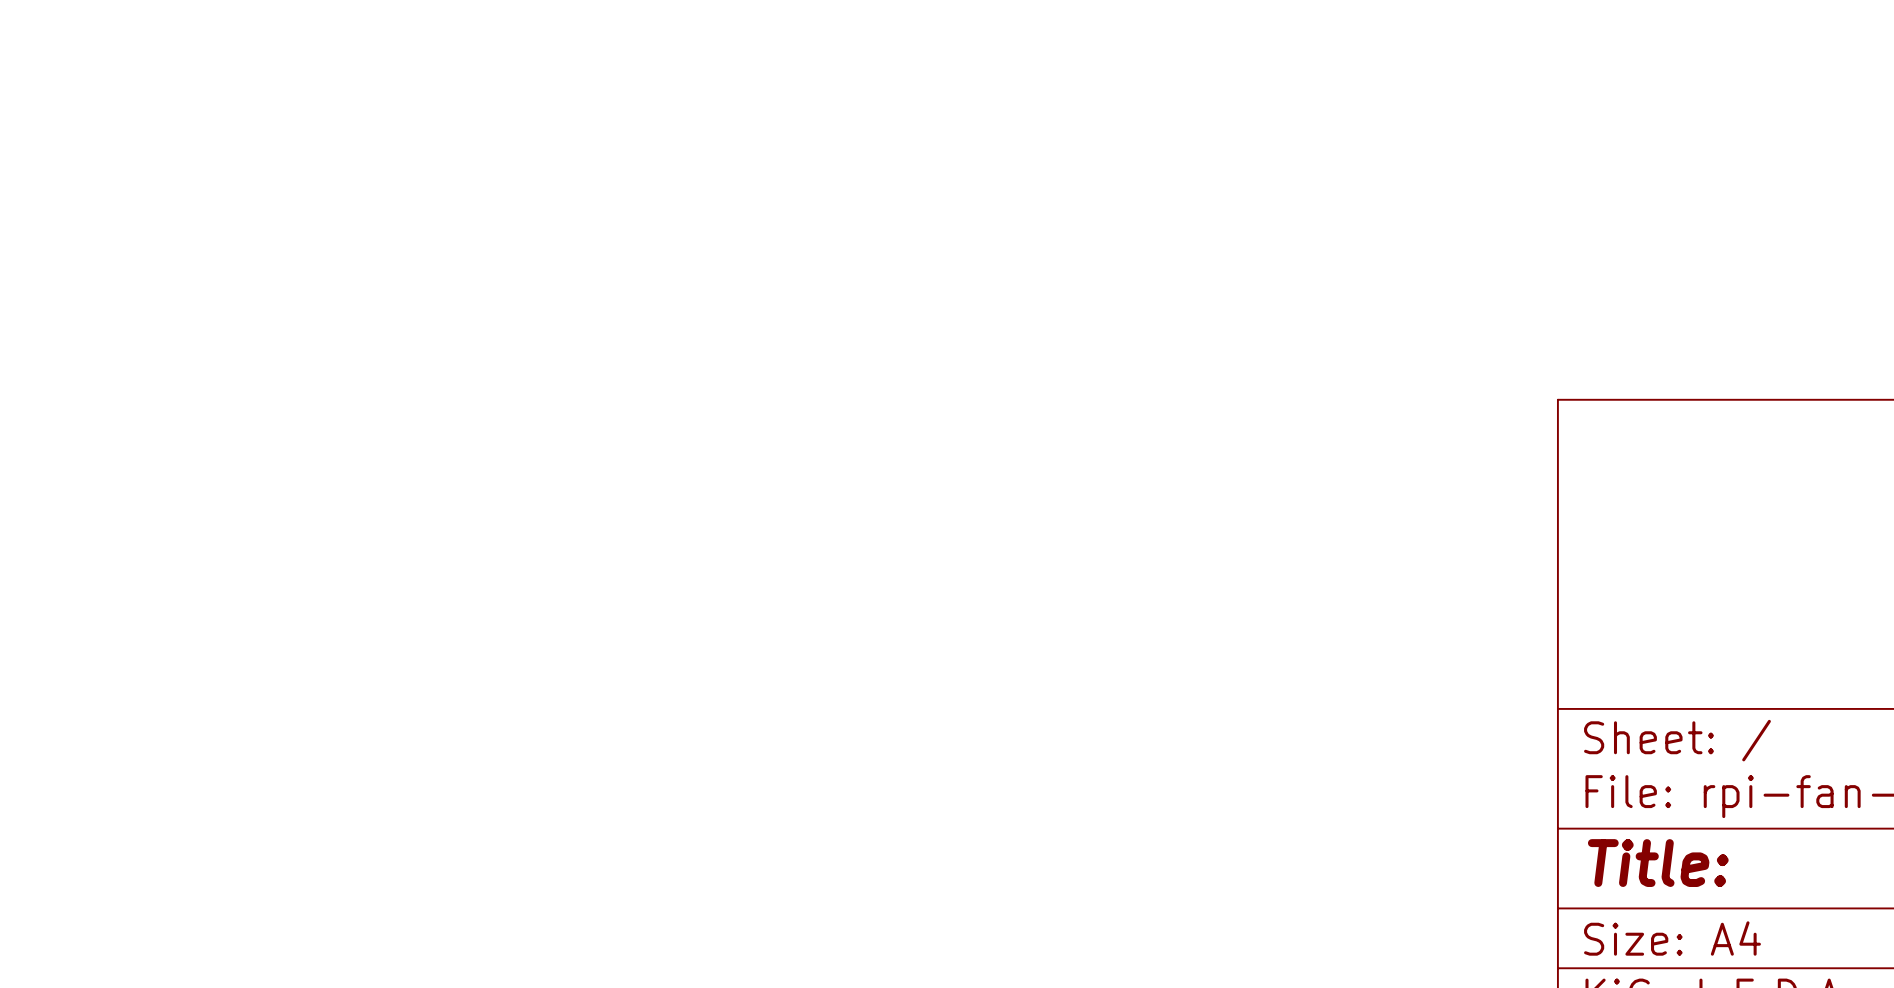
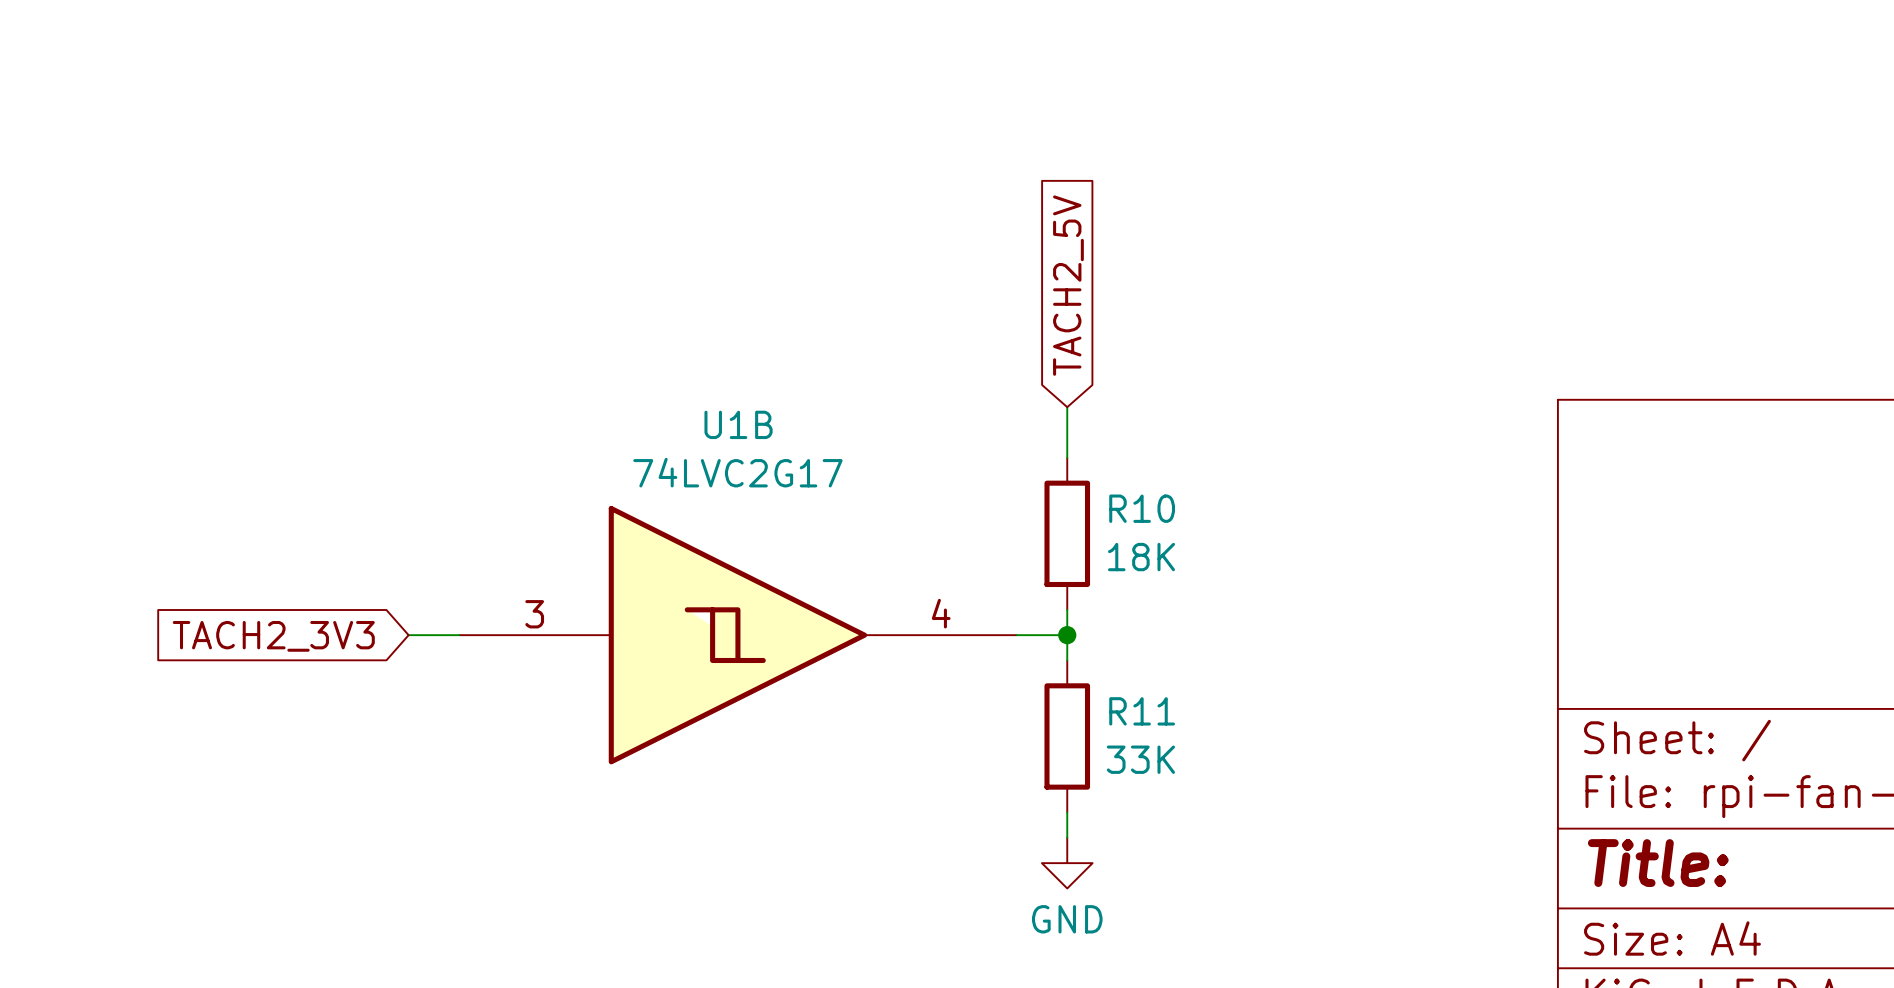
global label: none -> TACH2_5V (1068, 285)
wire: none -> (1067, 407) (1067, 457)
R10: none -> 18K (1067, 533)
wire: none -> (1067, 609) (1067, 660)
wire: none -> (408, 635) (459, 635)
U1B: none -> 74LVC2G17 (737, 635)
wire: none -> (1016, 635) (1067, 635)
junction: none -> (1067, 635)
global label: none -> TACH2_3V3 (273, 636)
R11: none -> 33K (1067, 736)
wire: none -> (1067, 812) (1067, 837)
power symbol: none -> GND (1067, 863)

